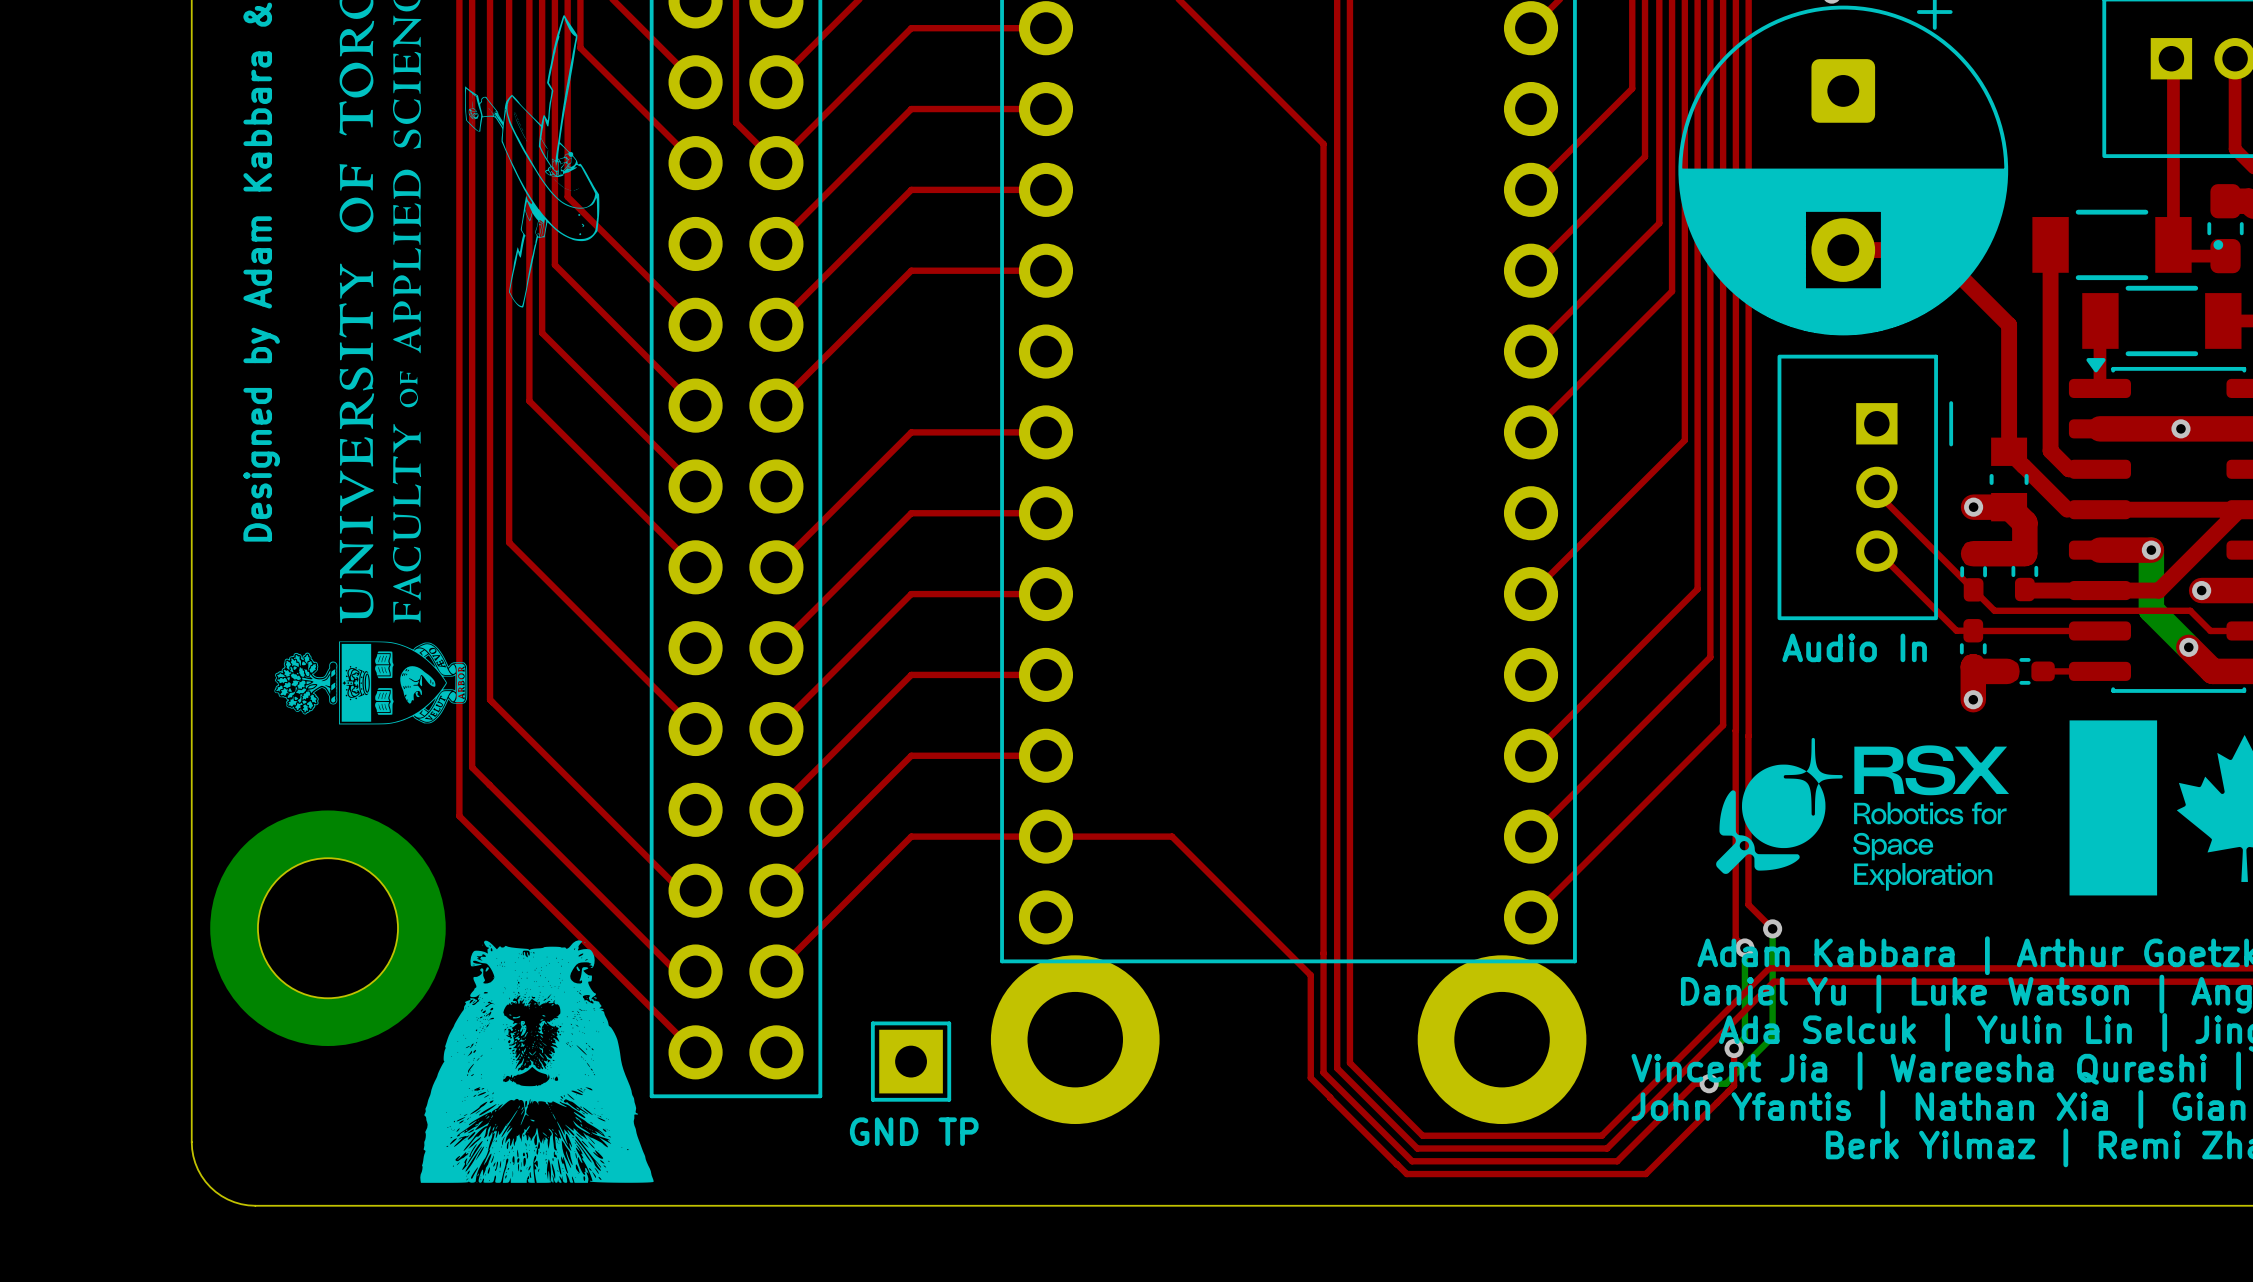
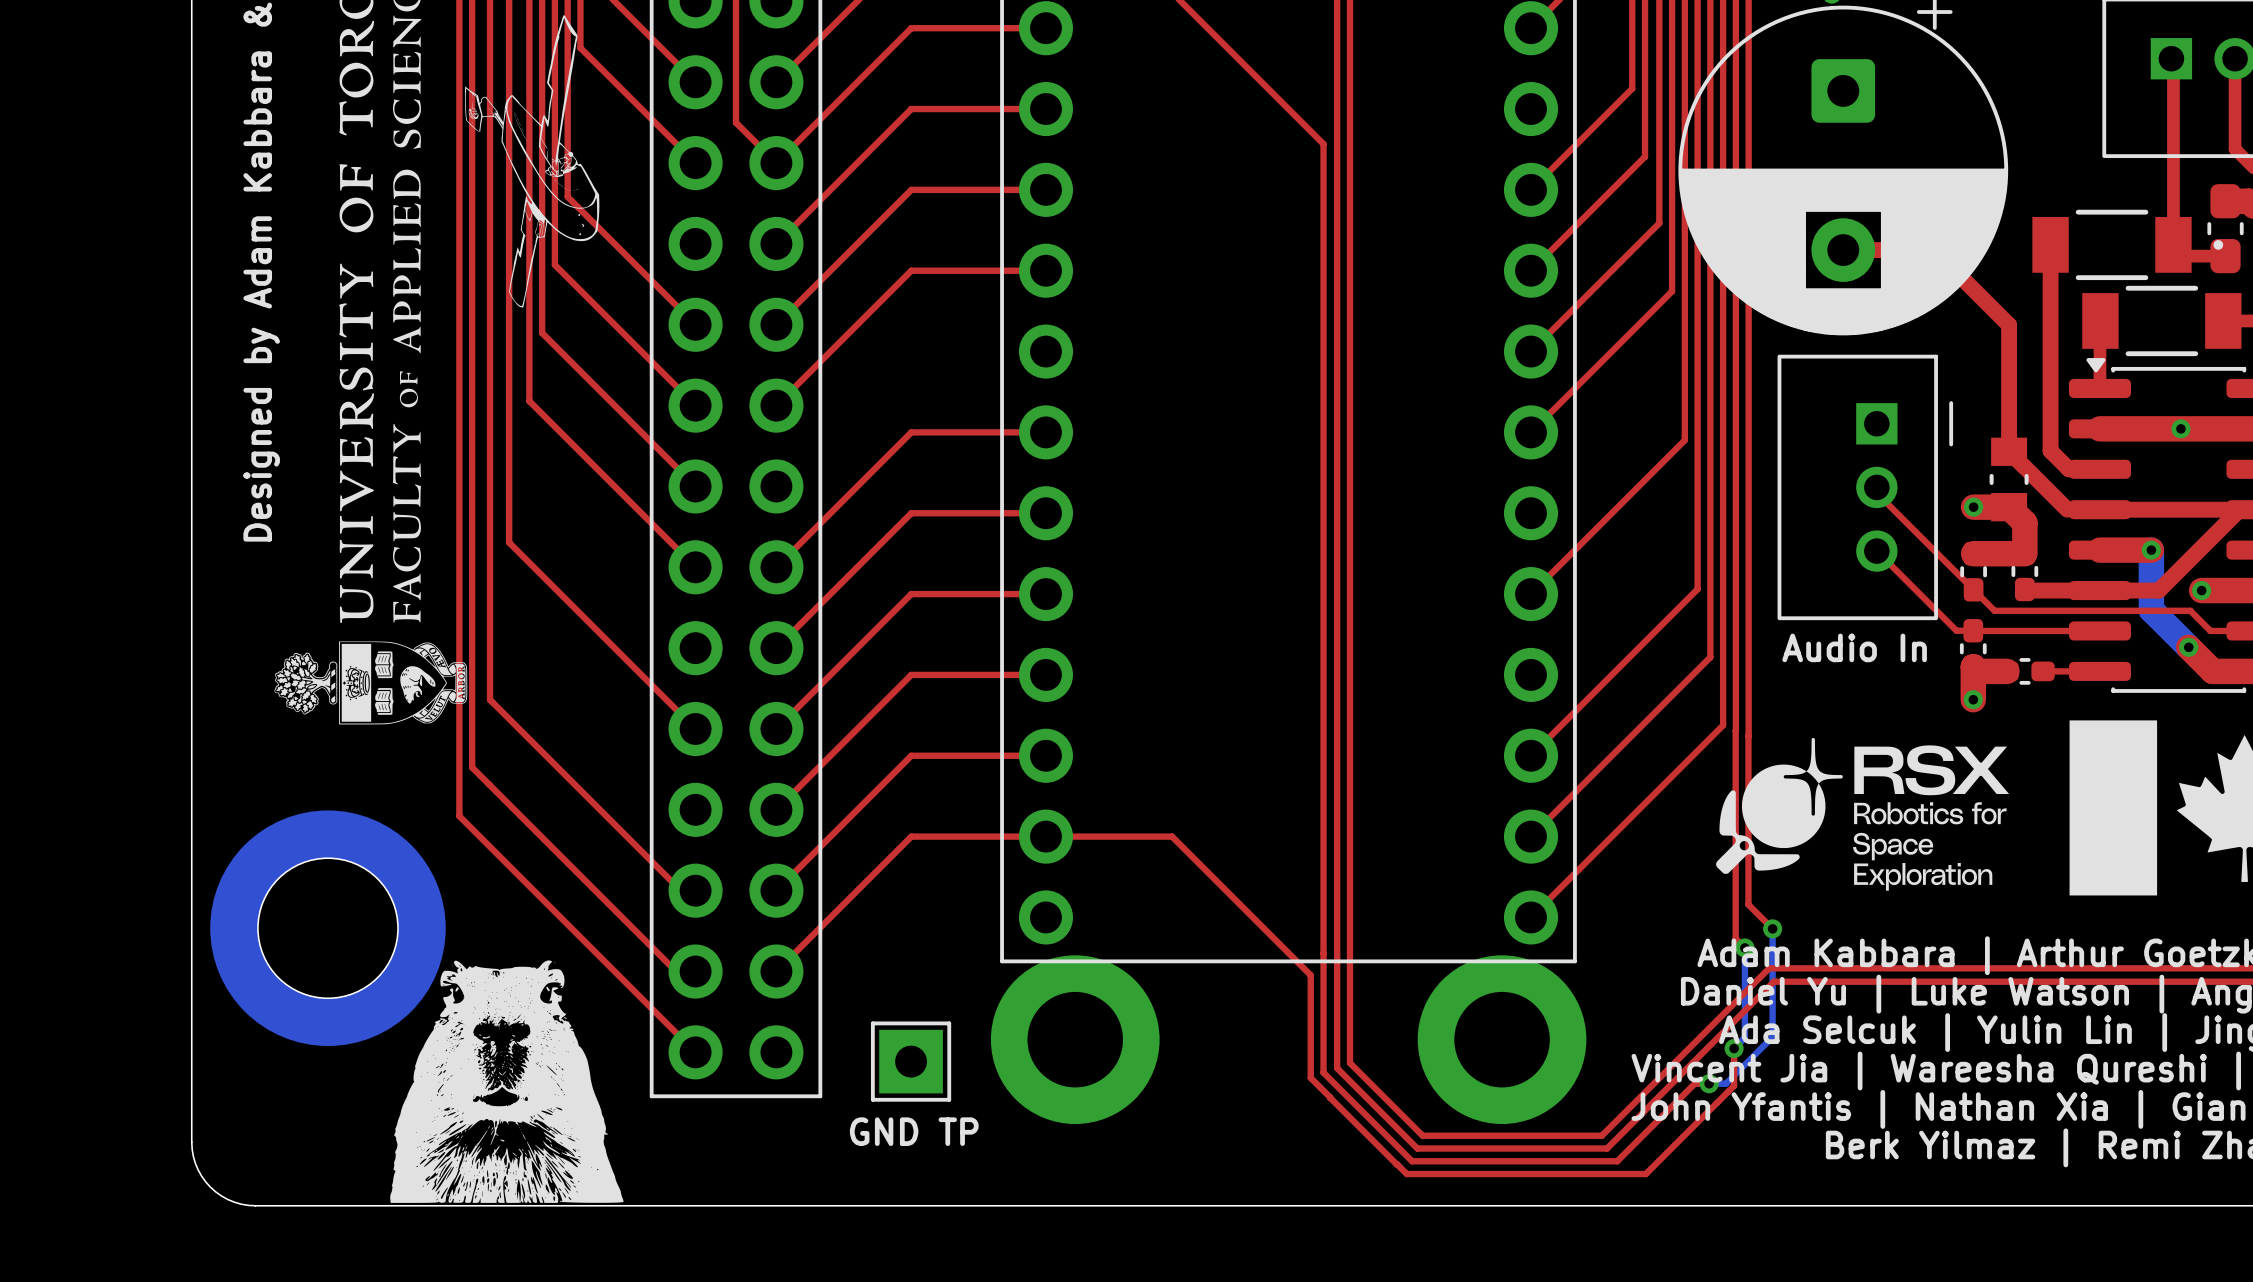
drawing position: (536, 1061) -> (506, 1081)

